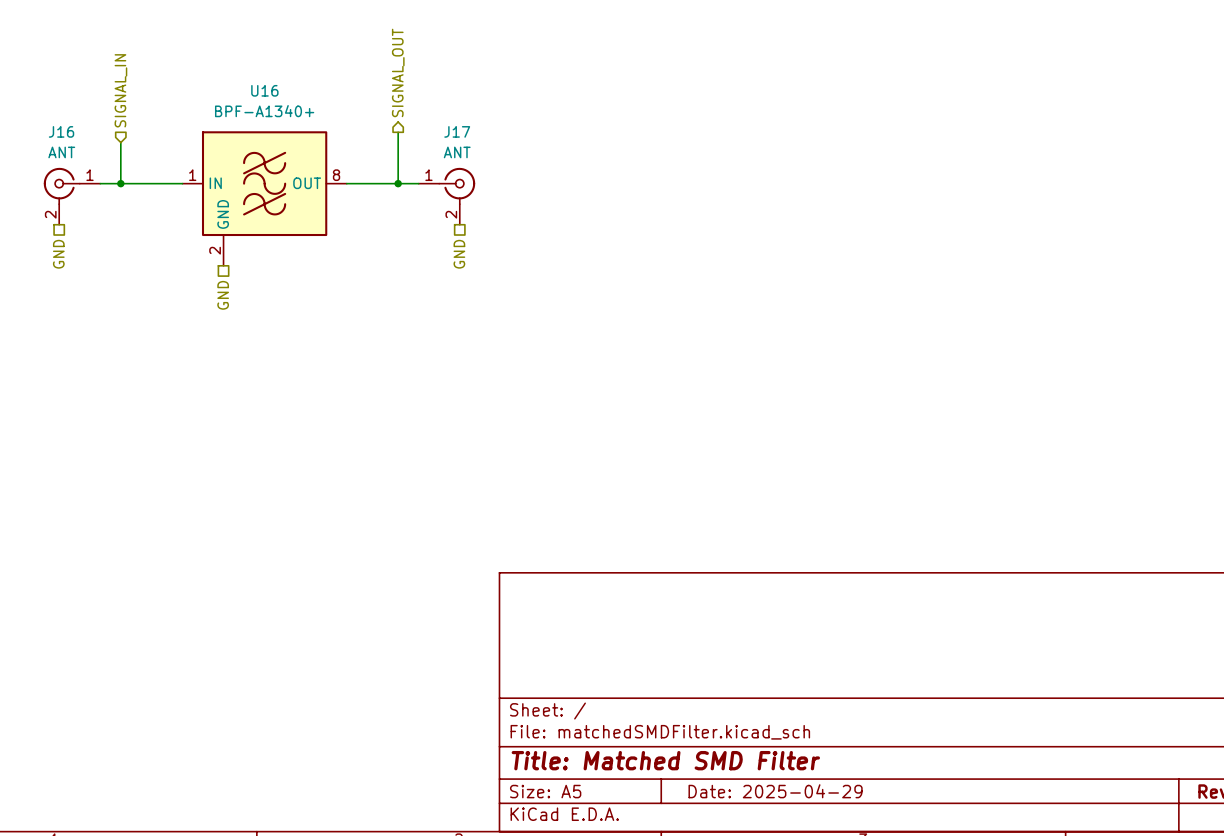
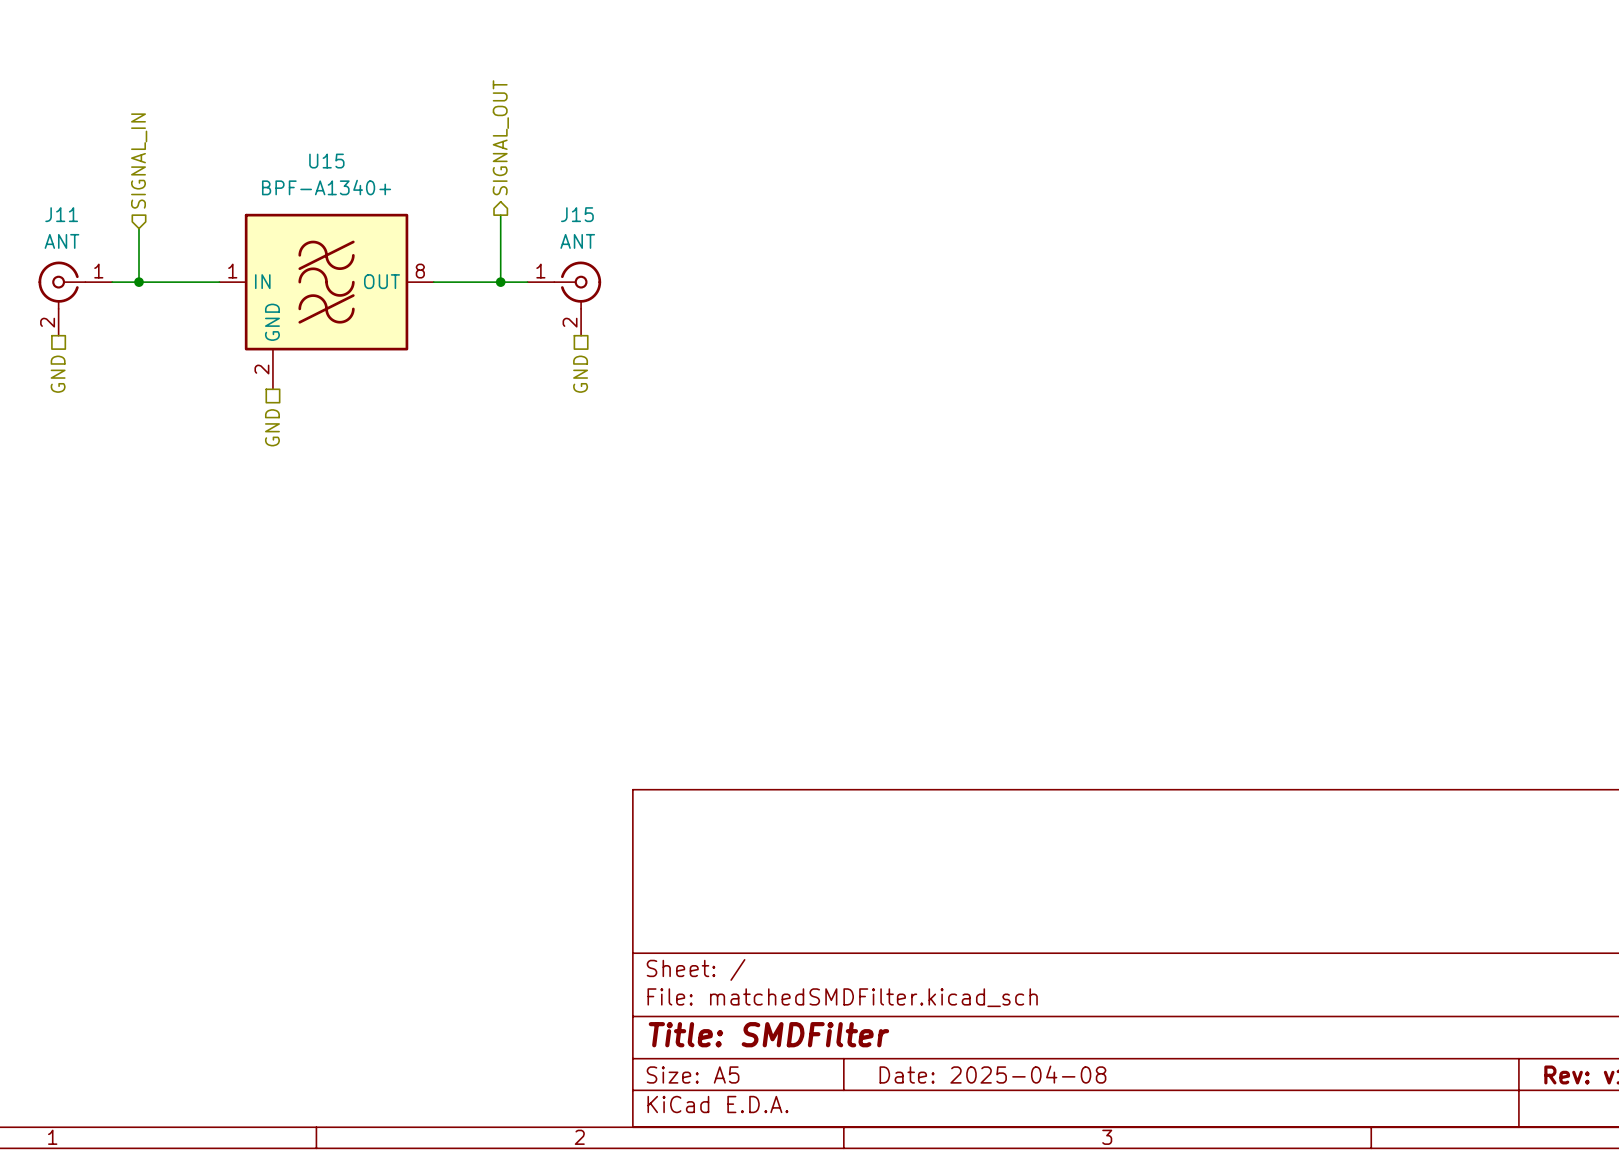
U16 name: U16 (264, 90) -> U15 (326, 161)
J16 name: J16 (61, 131) -> J11 (61, 214)
J17 name: J17 (457, 131) -> J15 (577, 214)
title block: Title: Matched SMD Filter (665, 760) -> Title: SMDFilter (768, 1034)
title block: Date: 2025-04-29 (775, 791) -> Date: 2025-04-08 (992, 1074)

